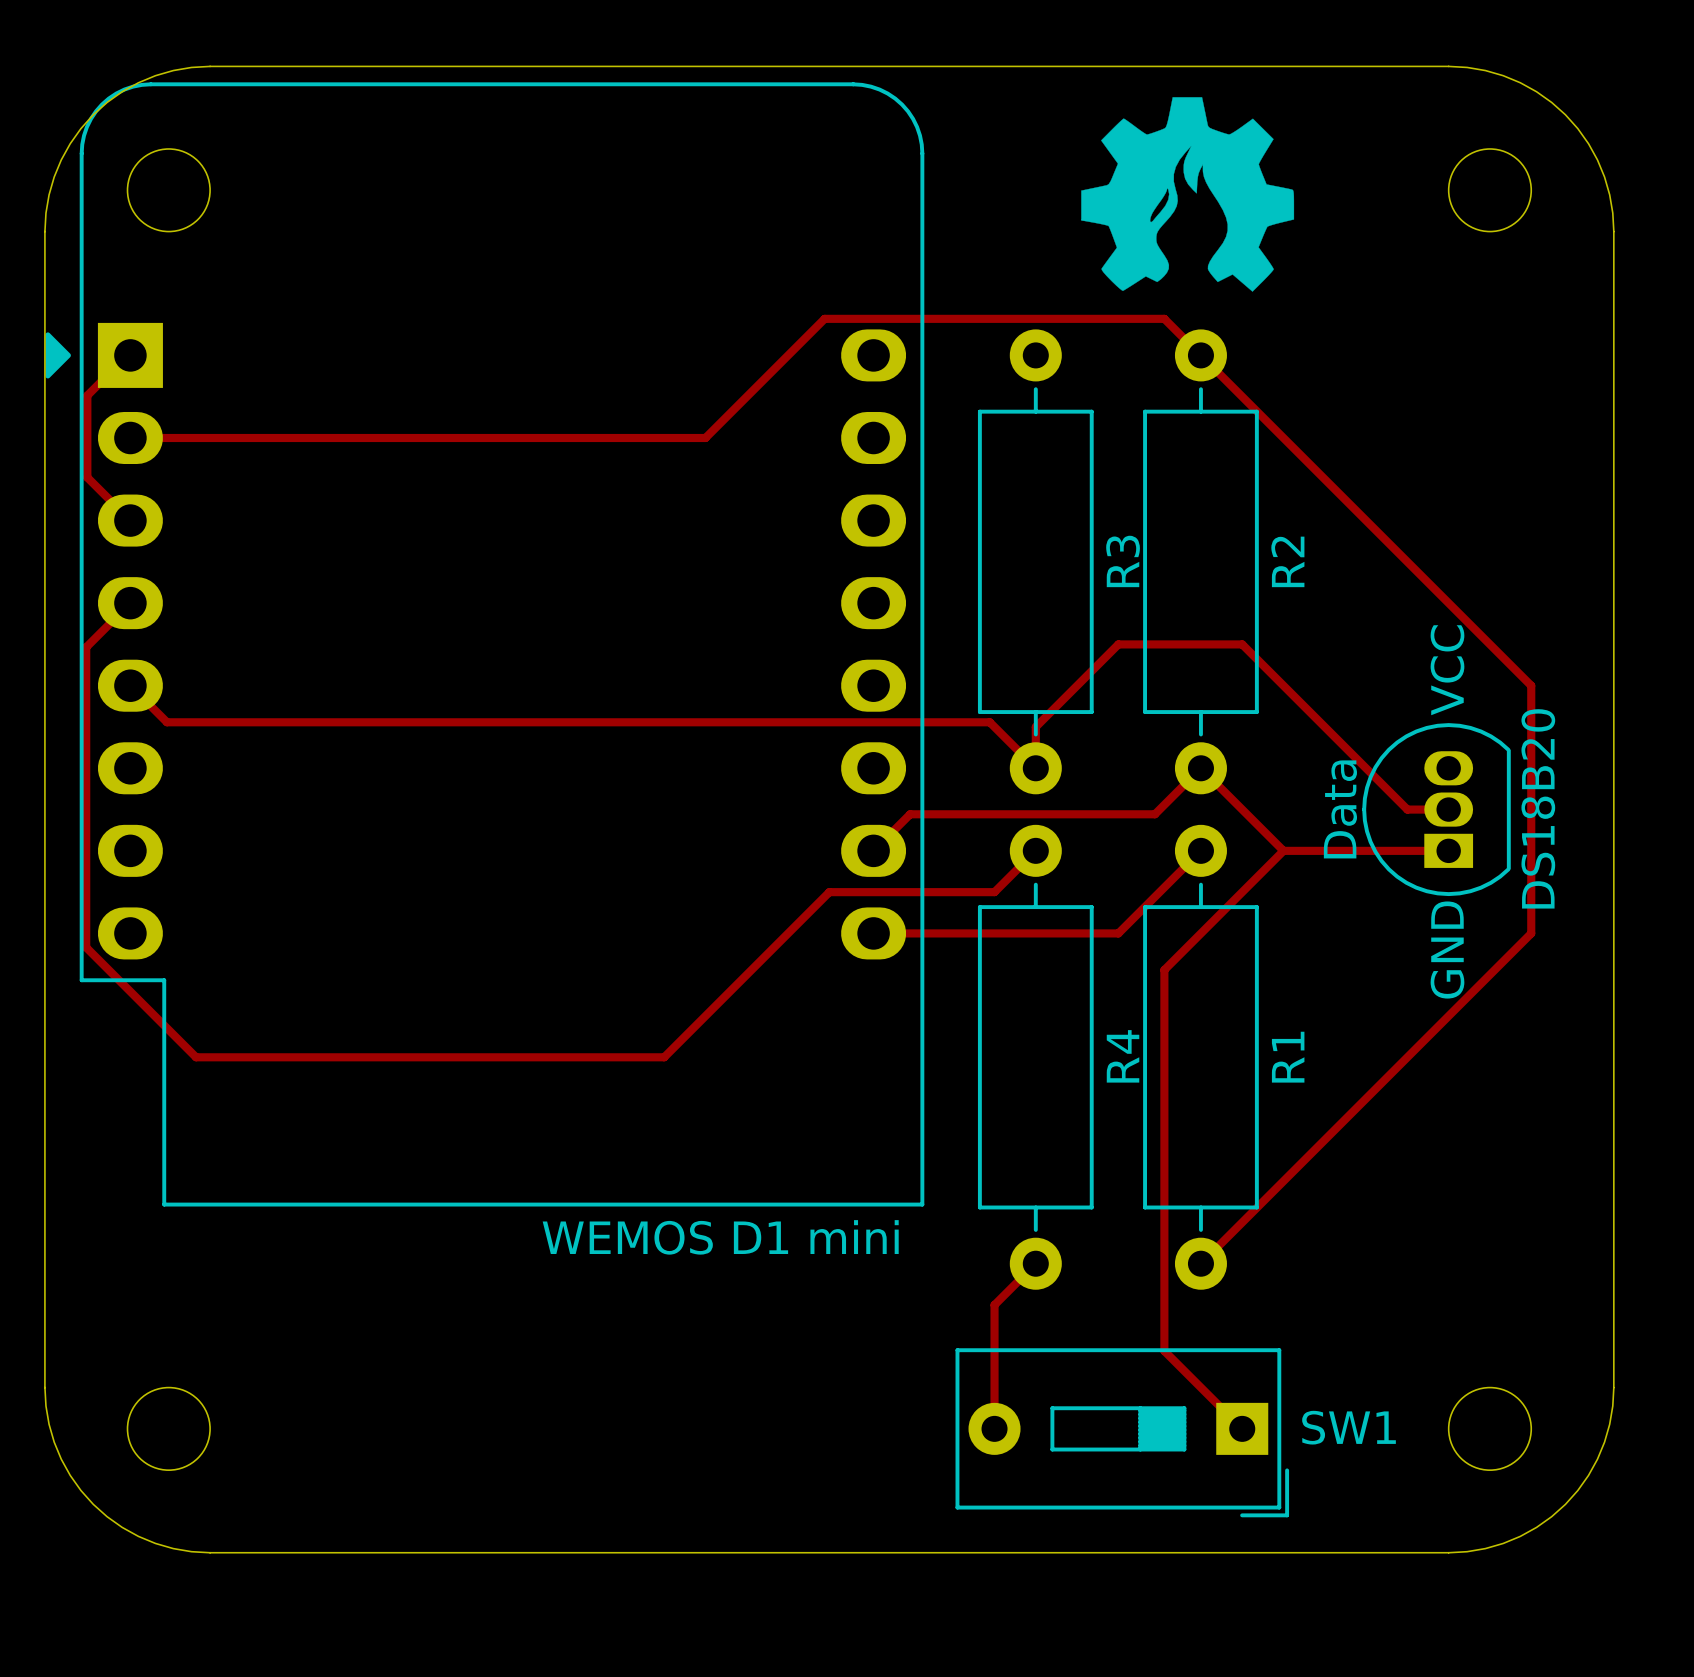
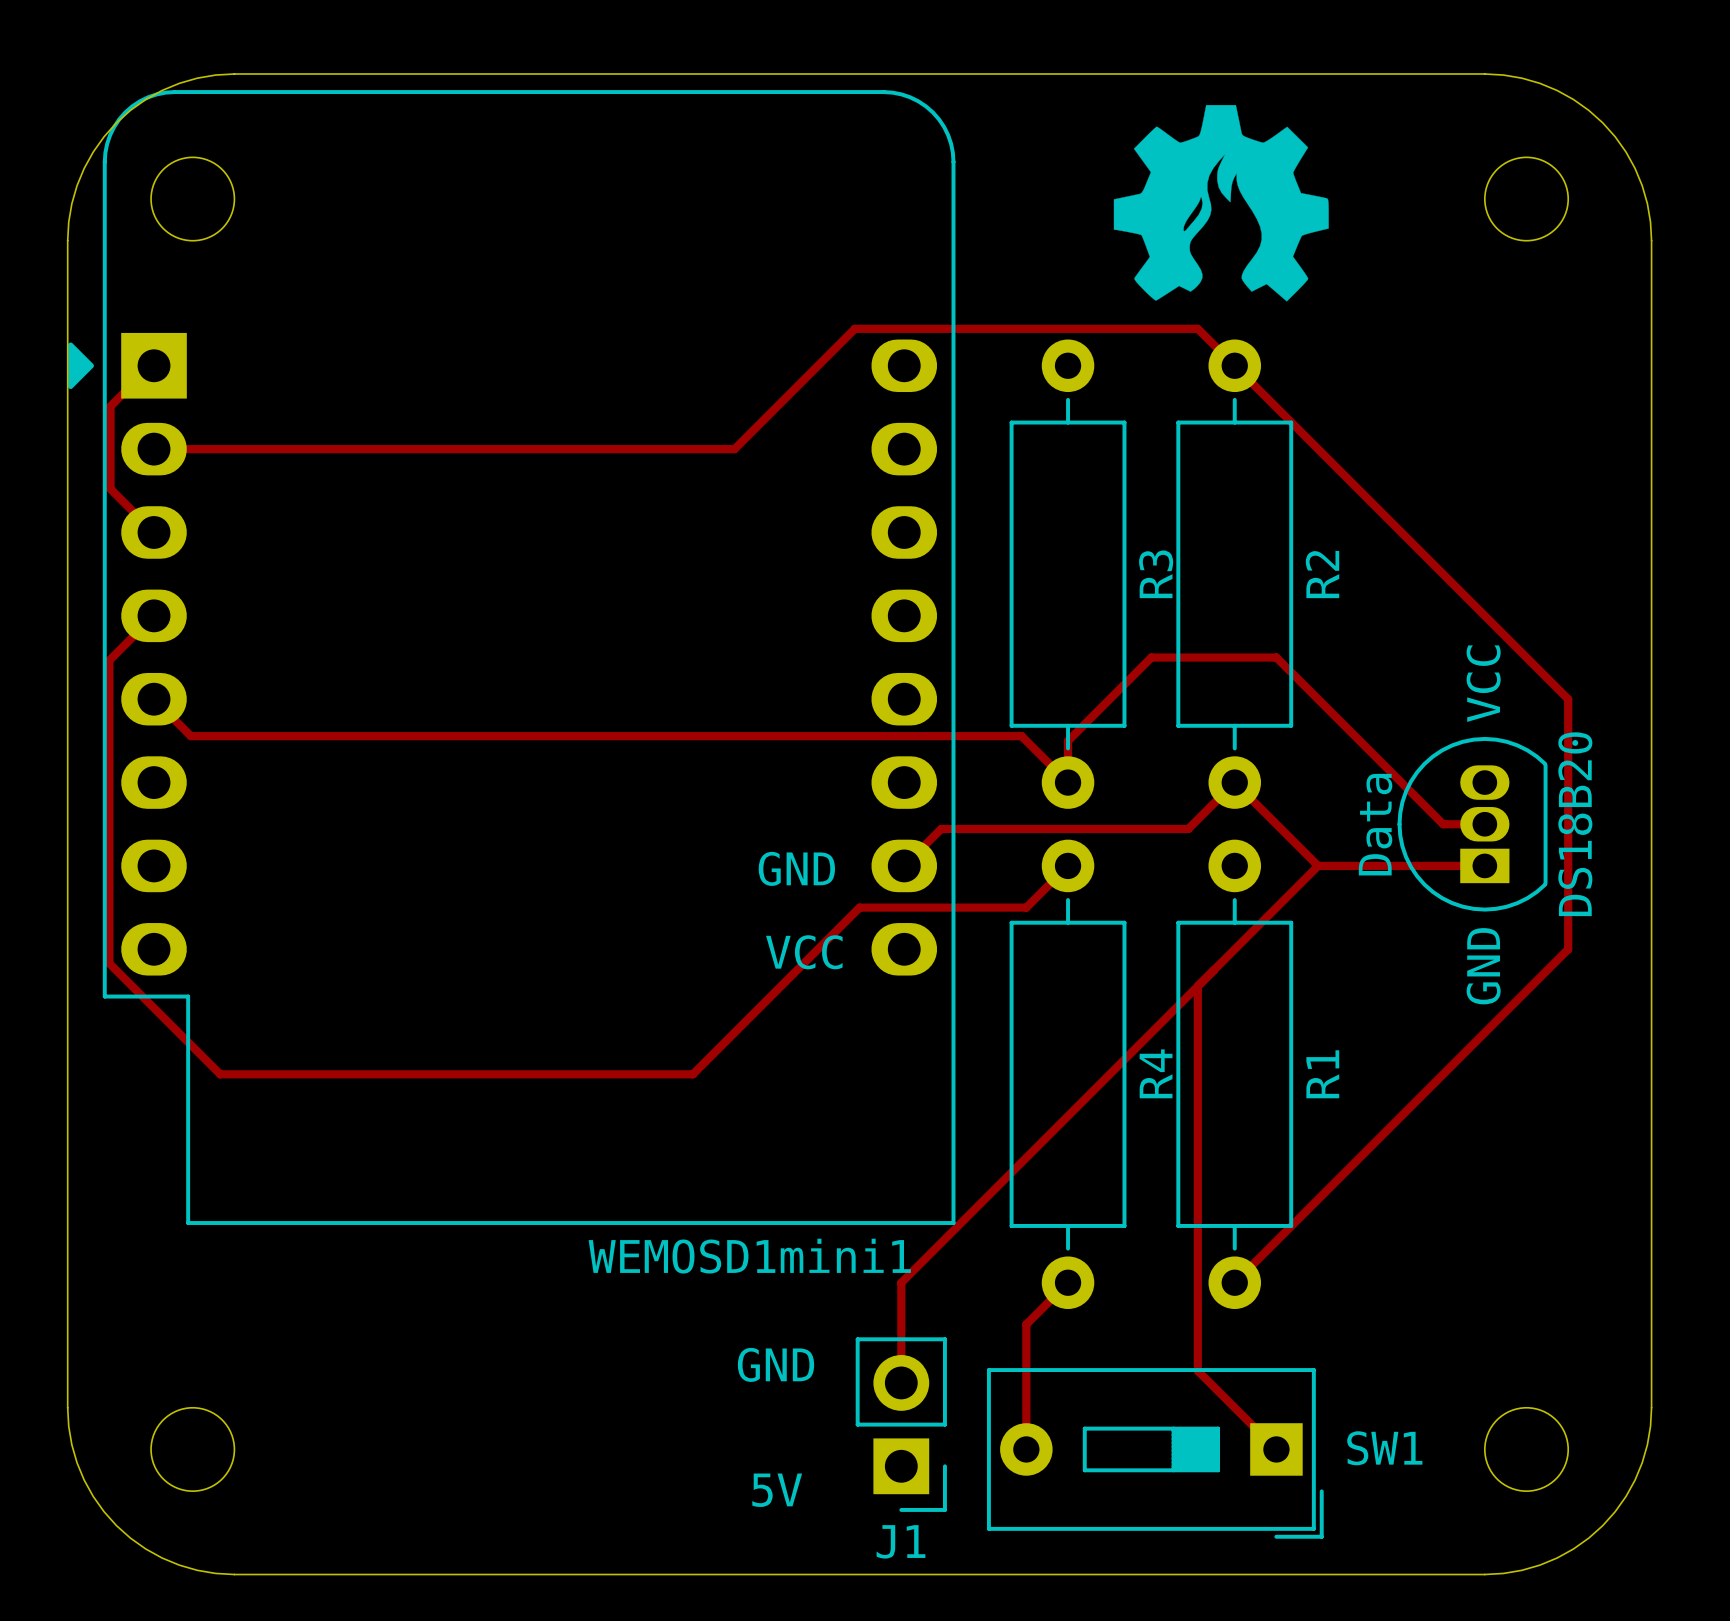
track: (1200, 850) (1118, 933) (873, 933) -> none
text: none -> GND (796, 868)
text: none -> VCC (804, 952)
track: none -> (1197, 986) (901, 1282) (901, 1382)
WEMOS D1 mini name: WEMOS D1 mini (720, 1237) -> WEMOSD1mini1 (749, 1256)
text: none -> GND (775, 1364)
J1: none -> (901, 1424)
text: none -> 5V (777, 1490)

